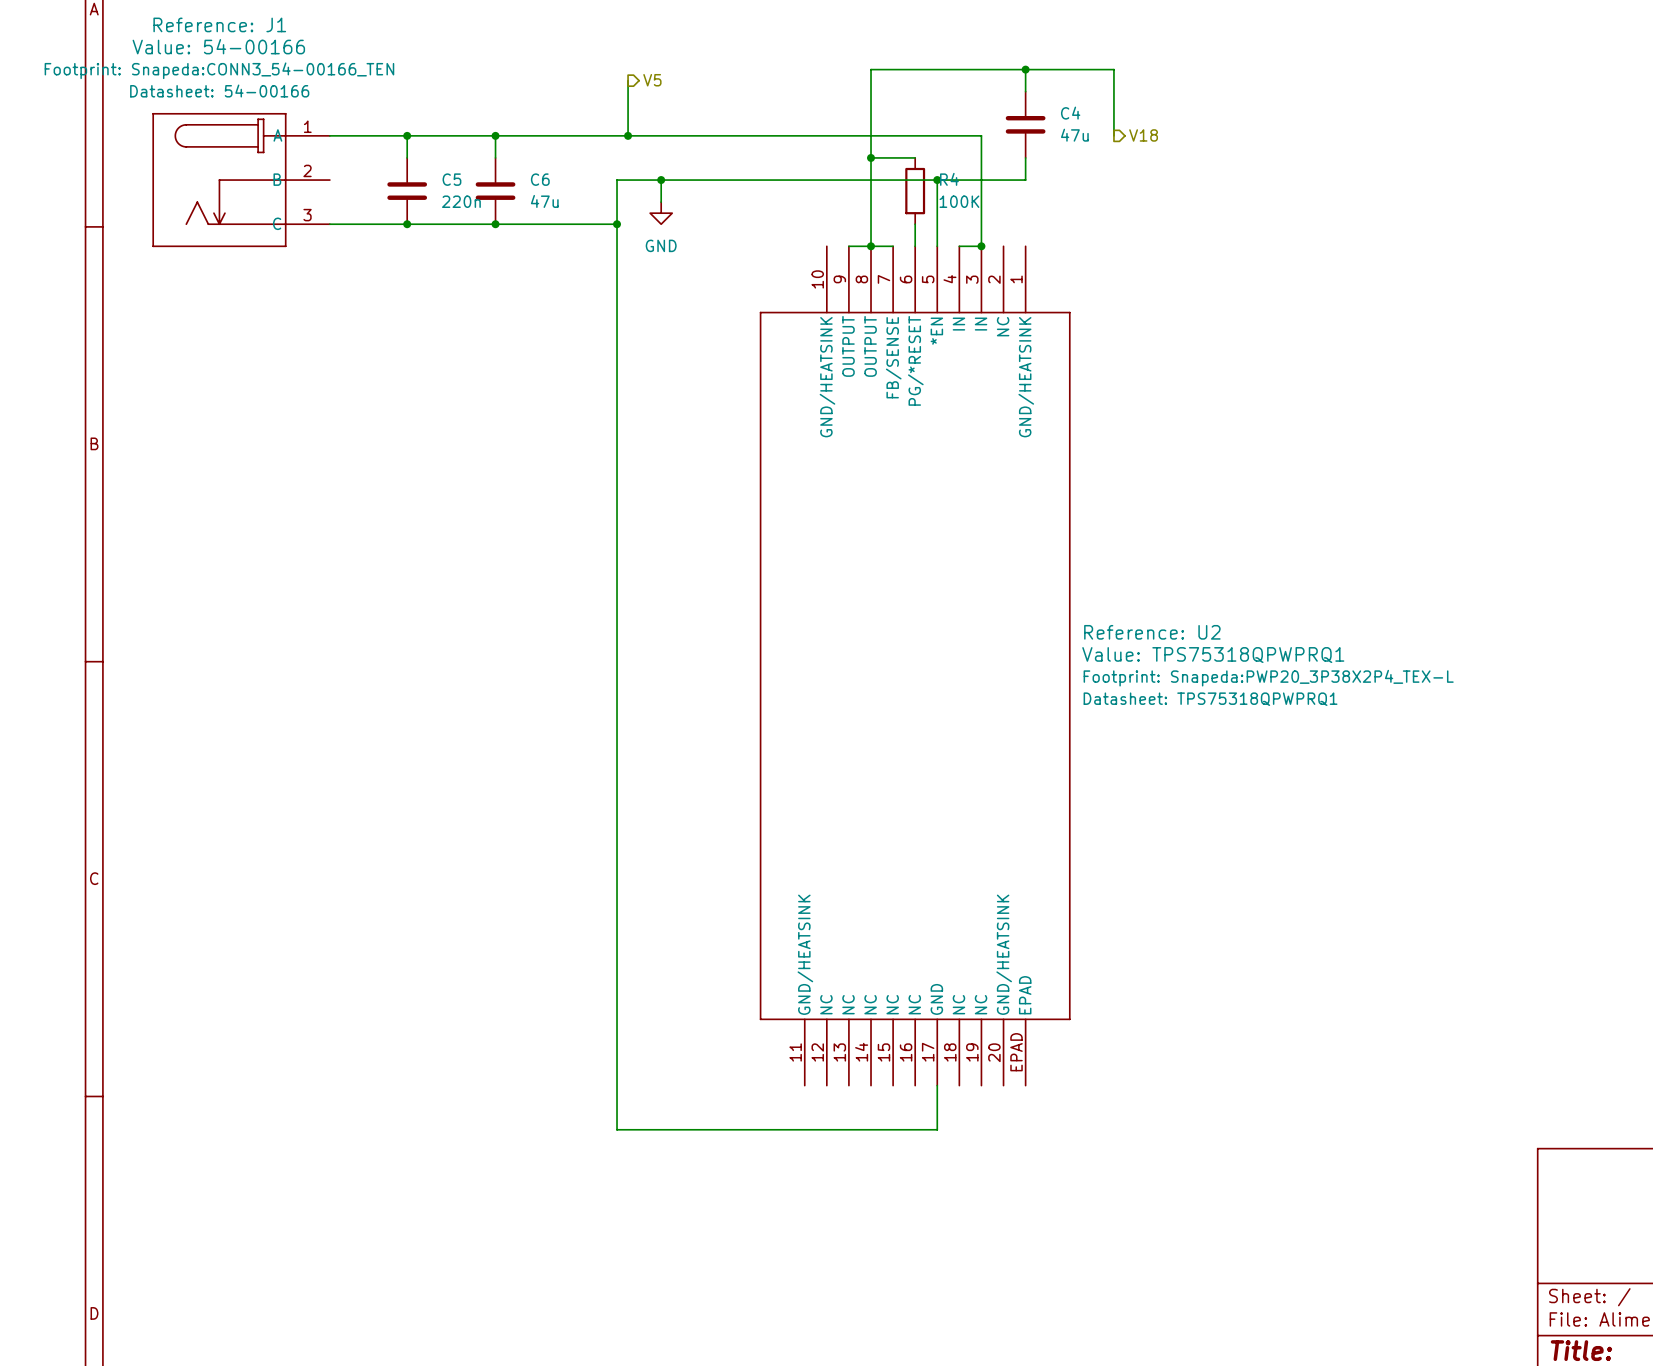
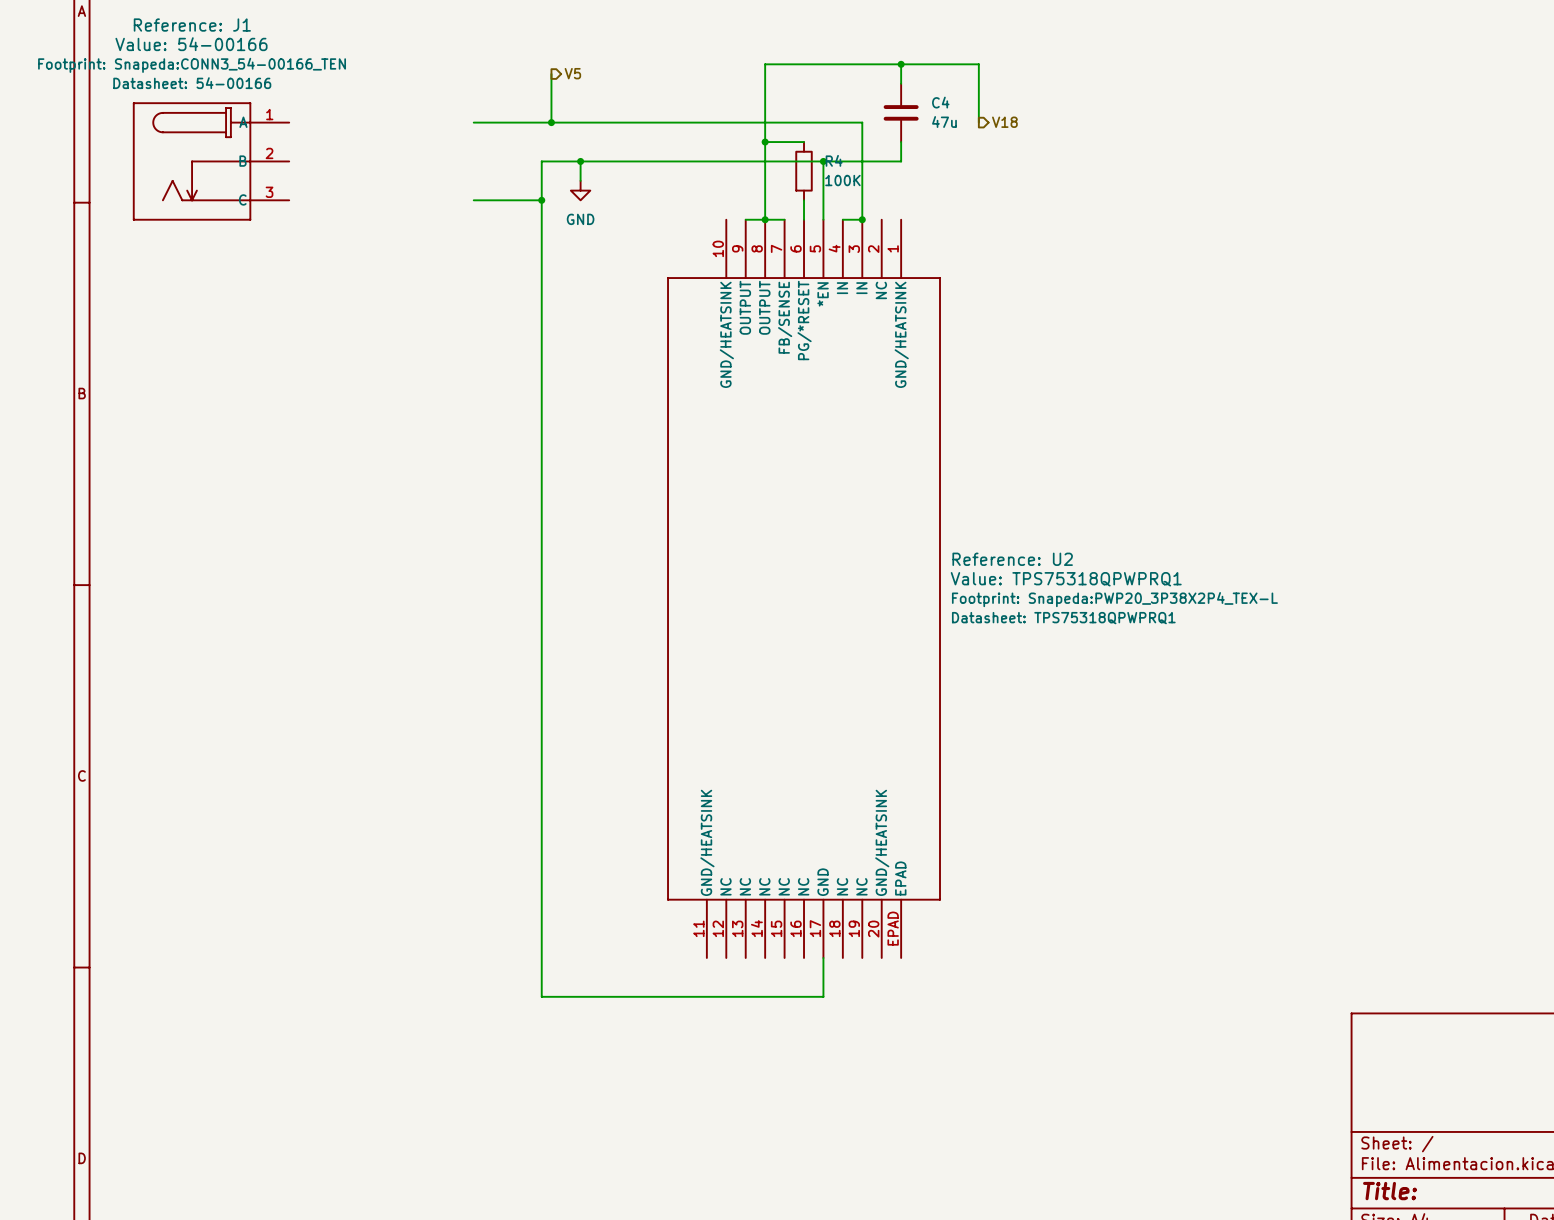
wire: (329, 135) (539, 135) -> none
wire: (407, 135) (407, 157) -> none
junction: (407, 135) -> none
wire: (495, 135) (495, 157) -> none
junction: (495, 135) -> none
C5: 220n (407, 191) -> none
C6: 47u (495, 191) -> none
wire: (329, 224) (539, 224) -> none
junction: (407, 224) -> none
junction: (495, 224) -> none

